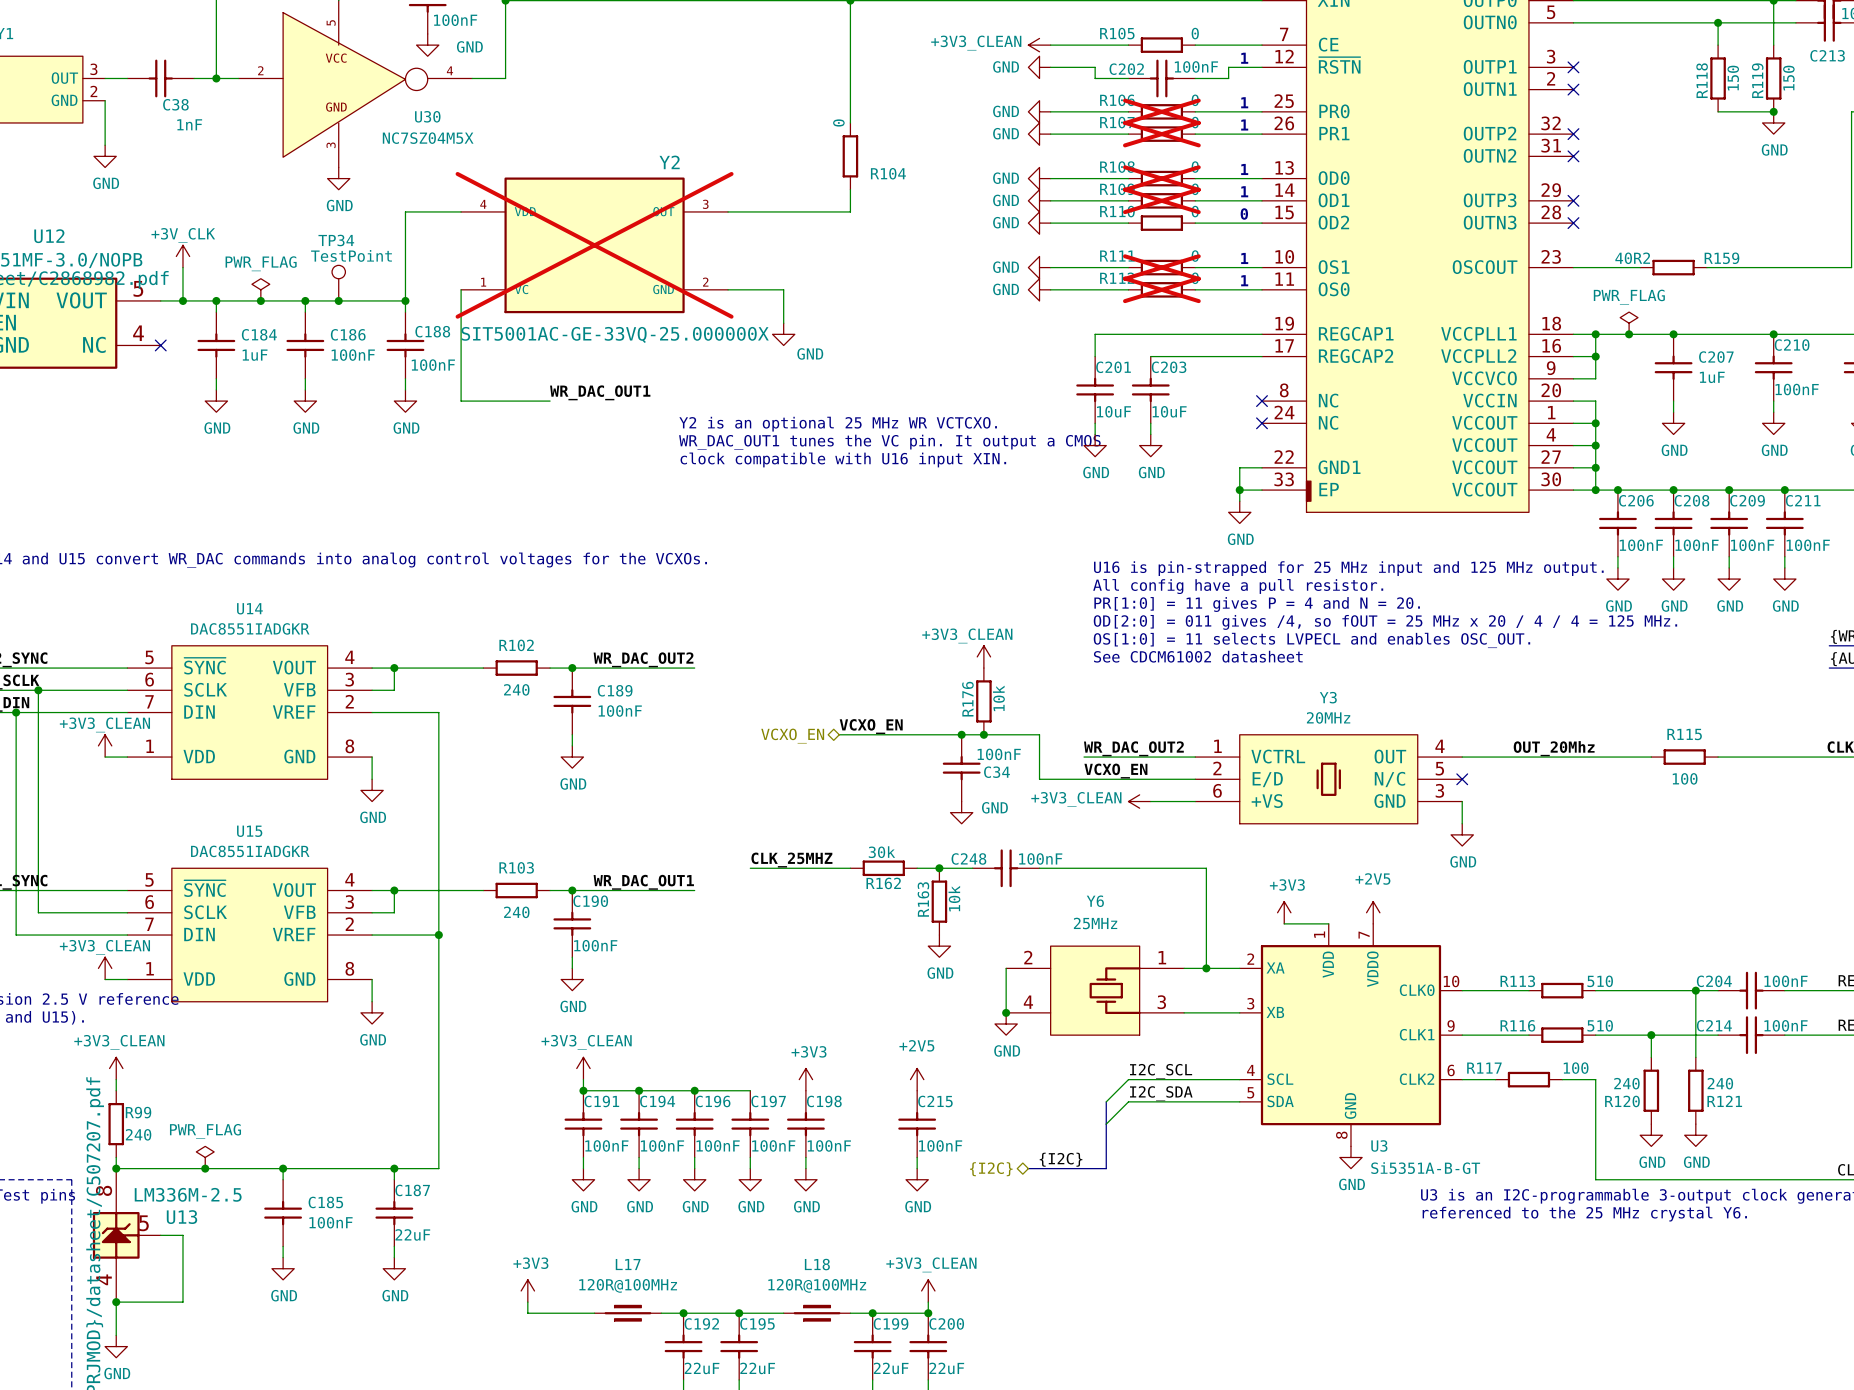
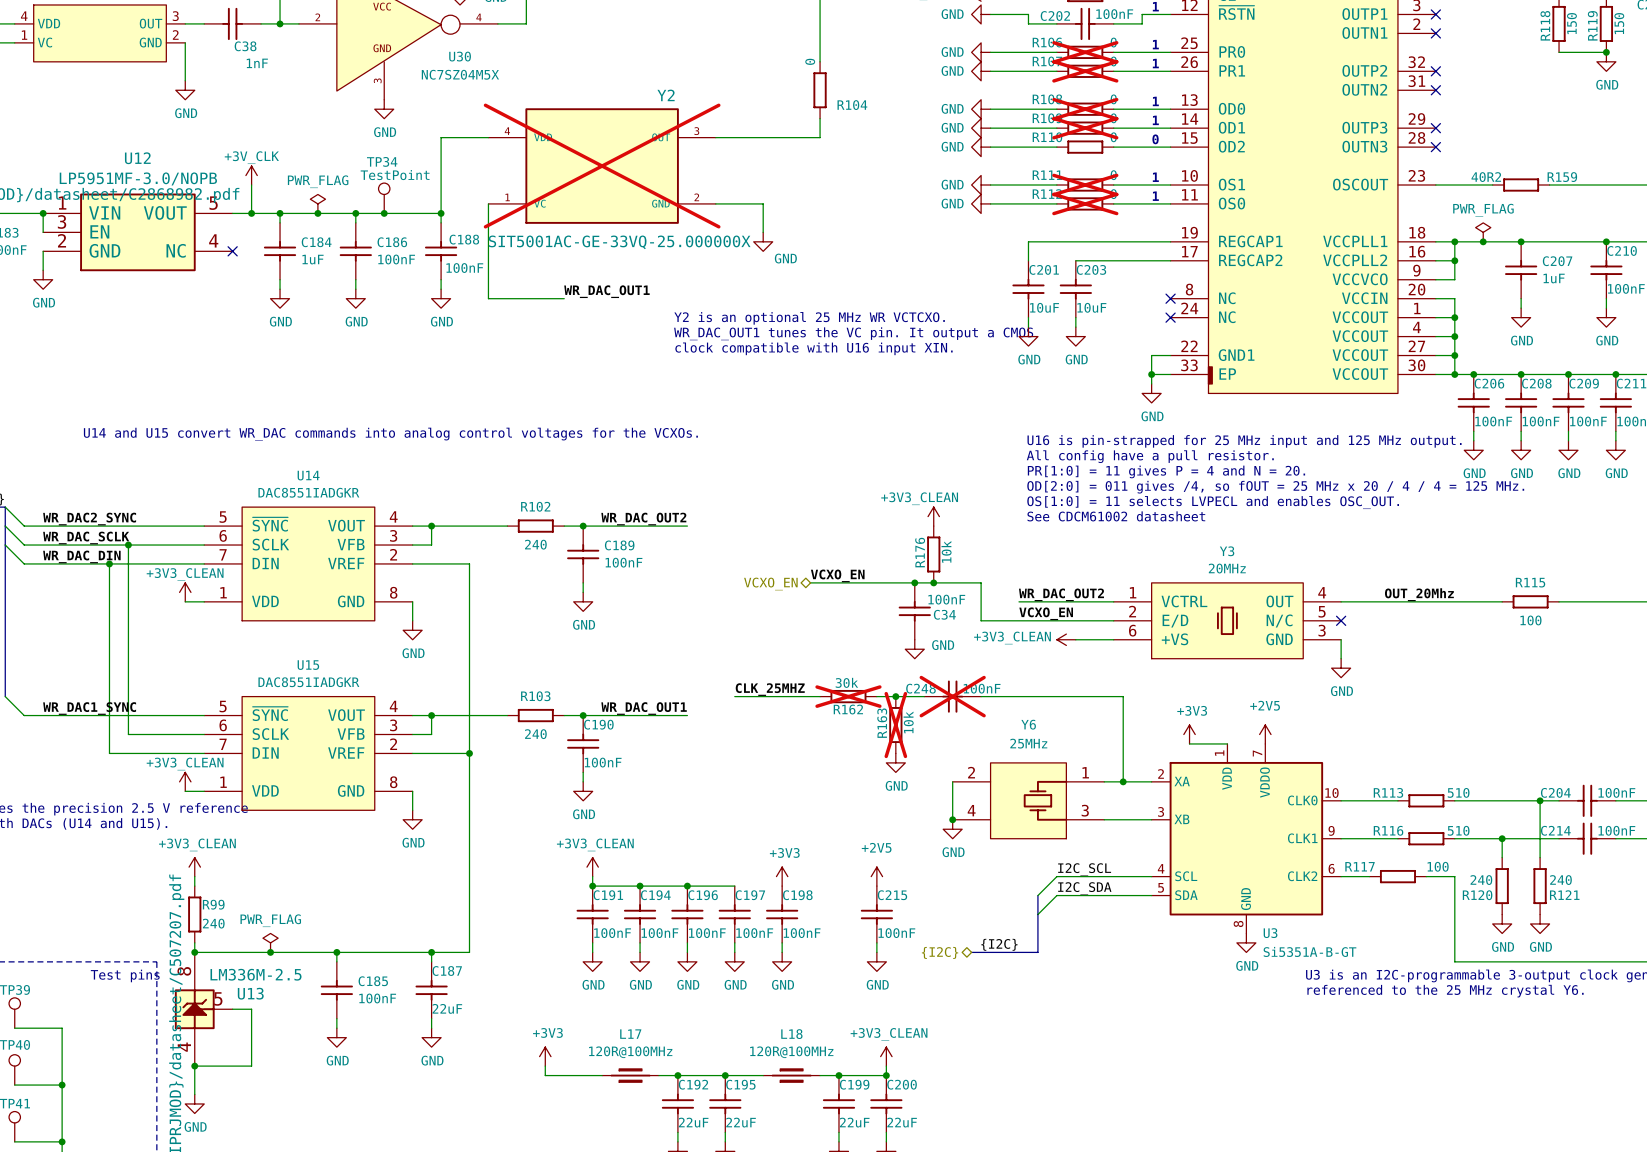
R162 do-not-place cross: none -> (848, 696)
C248 do-not-place cross: none -> (952, 696)
R163 do-not-place cross: none -> (895, 725)

